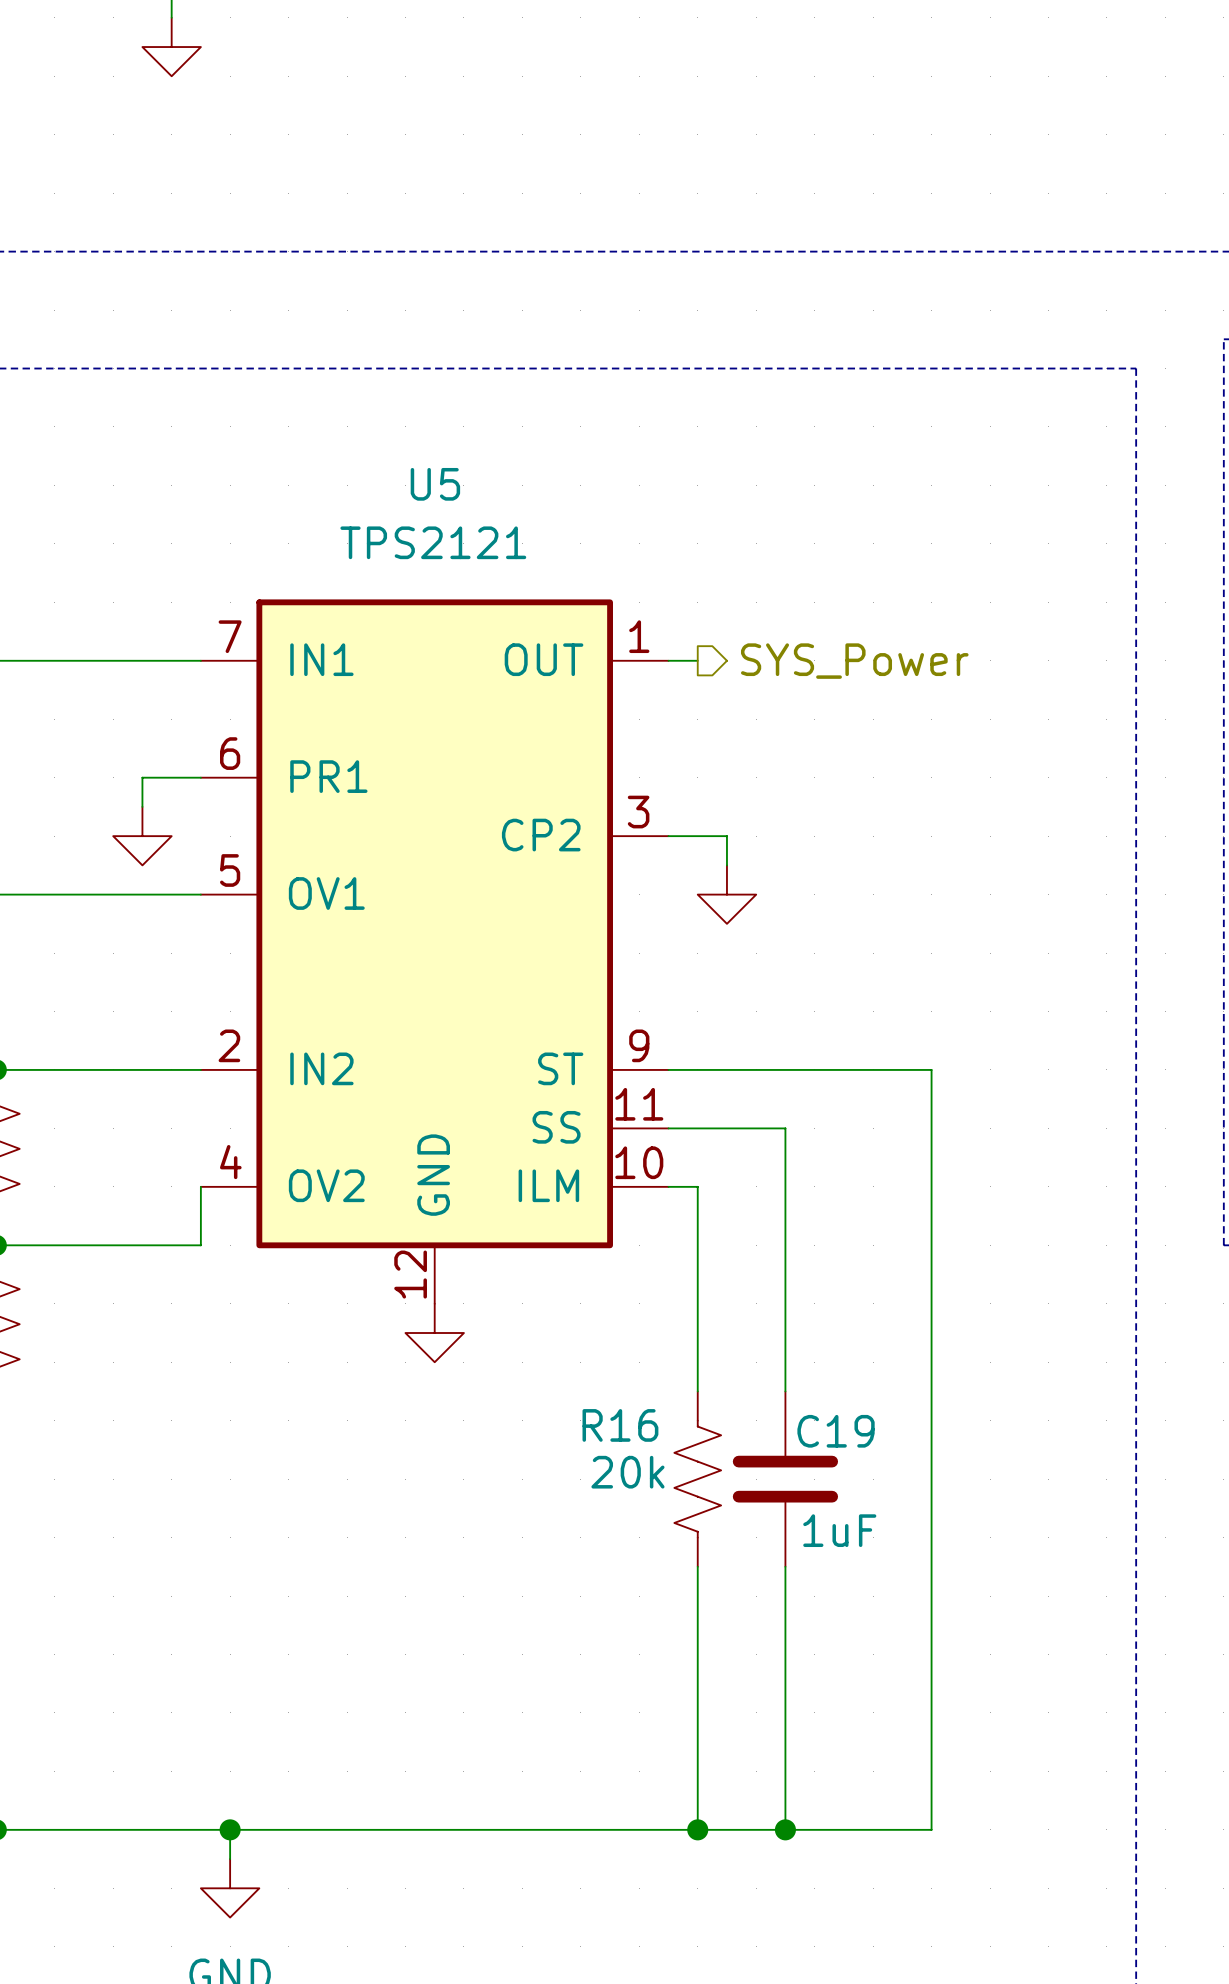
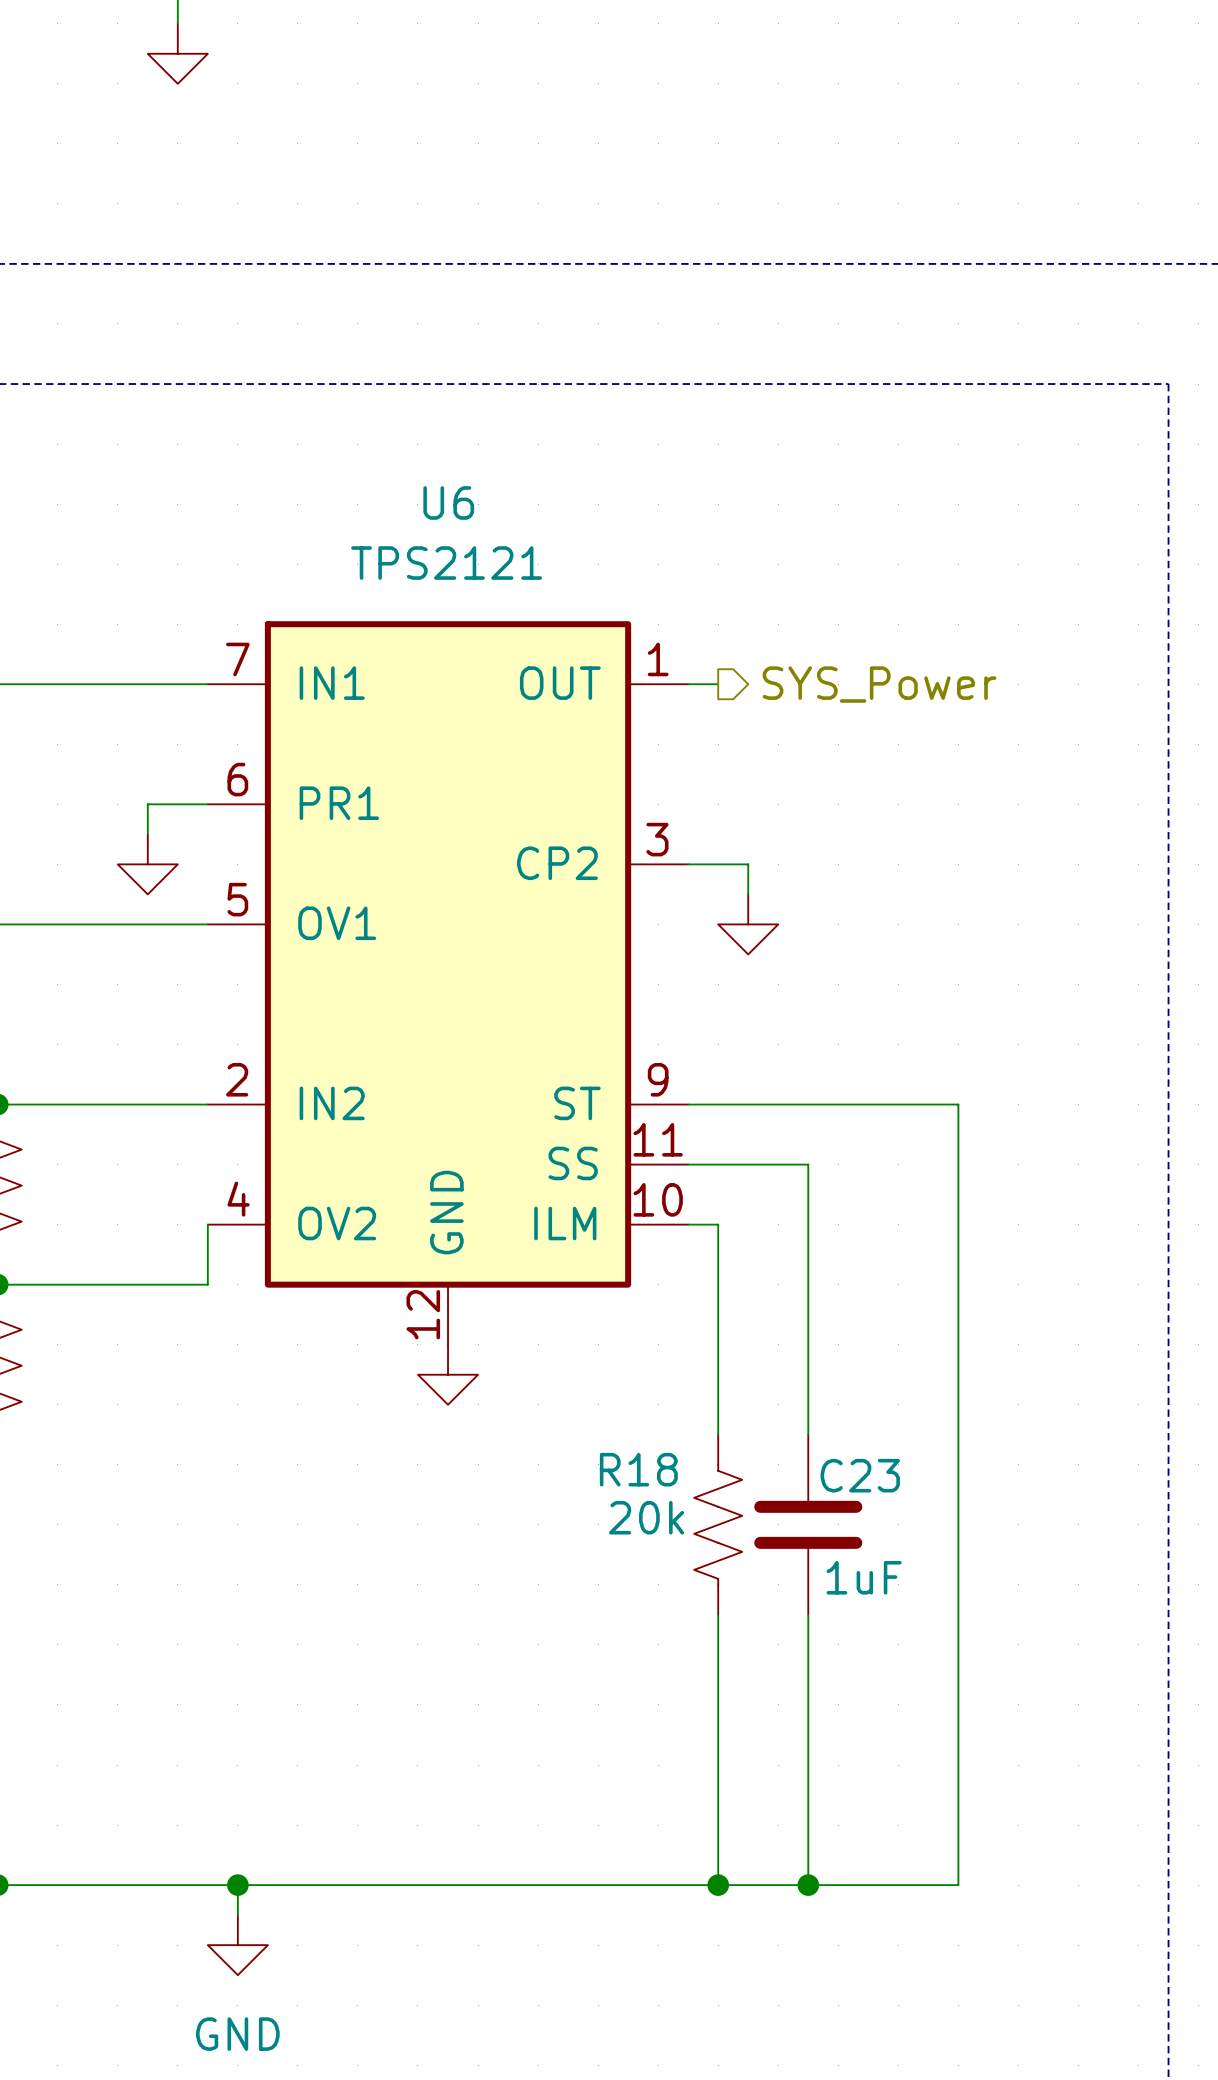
U5 name: U5 (435, 484) -> U6 (448, 502)
R16 name: R16 (620, 1425) -> R18 (638, 1469)
C19 name: C19 (836, 1431) -> C23 (860, 1475)

